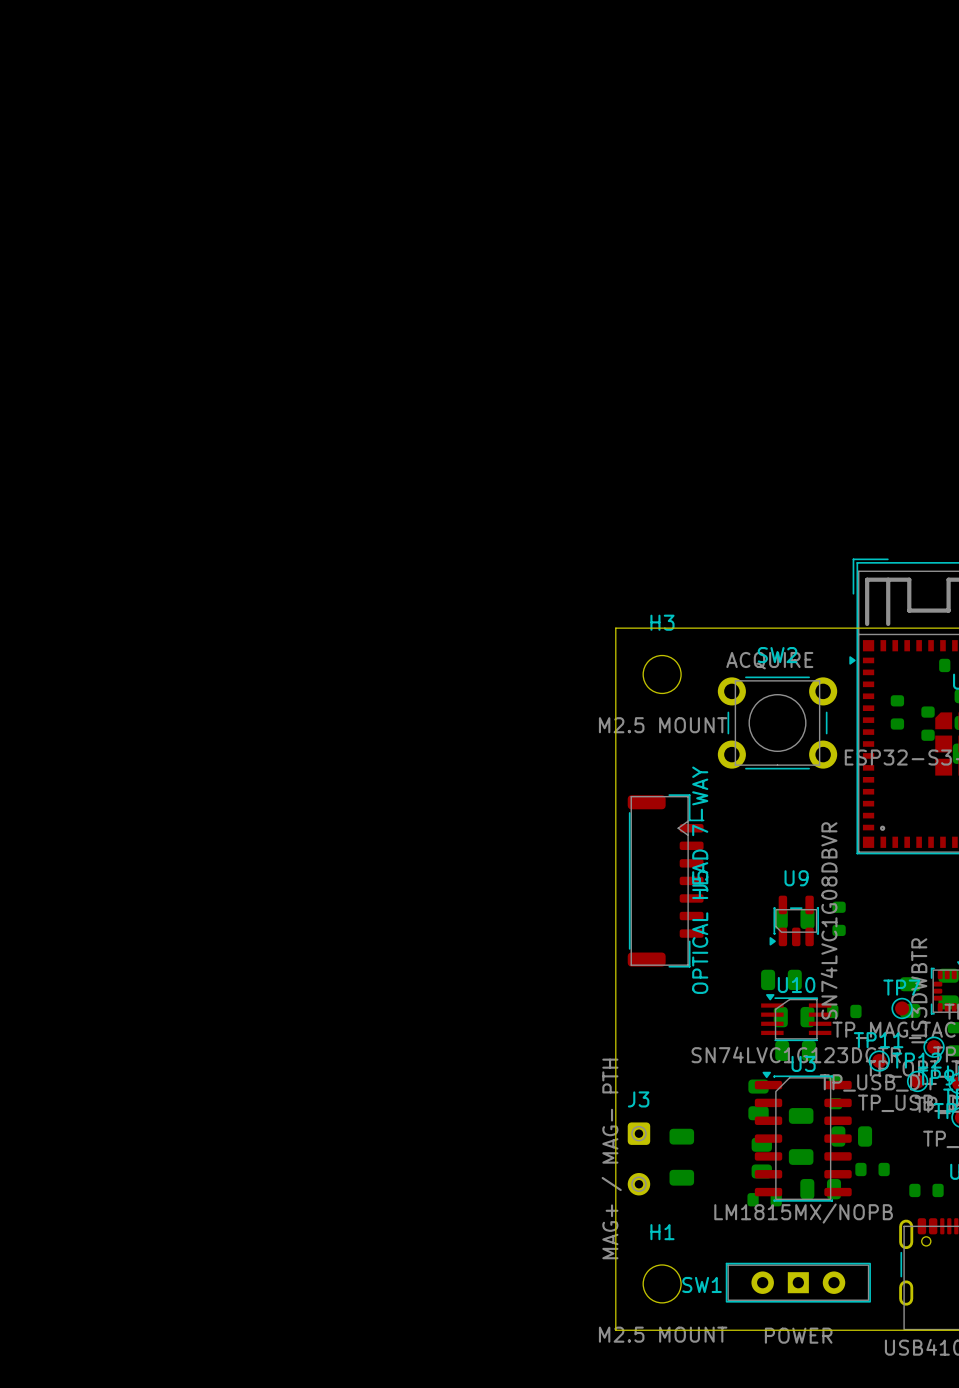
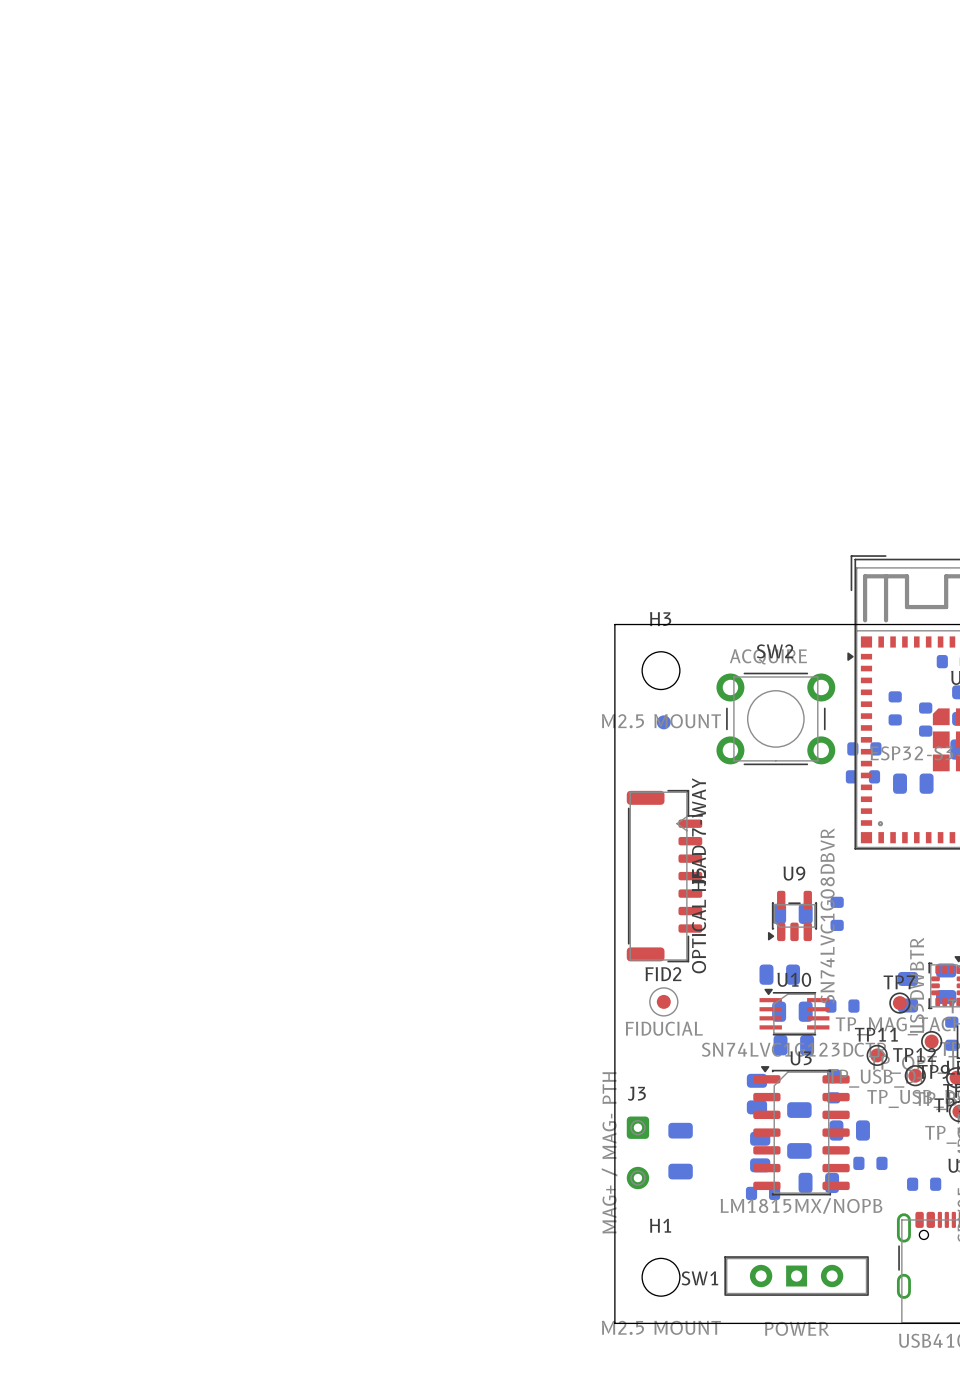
part: none -> (663, 722)
part: none -> (864, 748)
part: none -> (862, 776)
part: none -> (913, 783)
FID2: none -> FIDUCIAL (663, 1001)

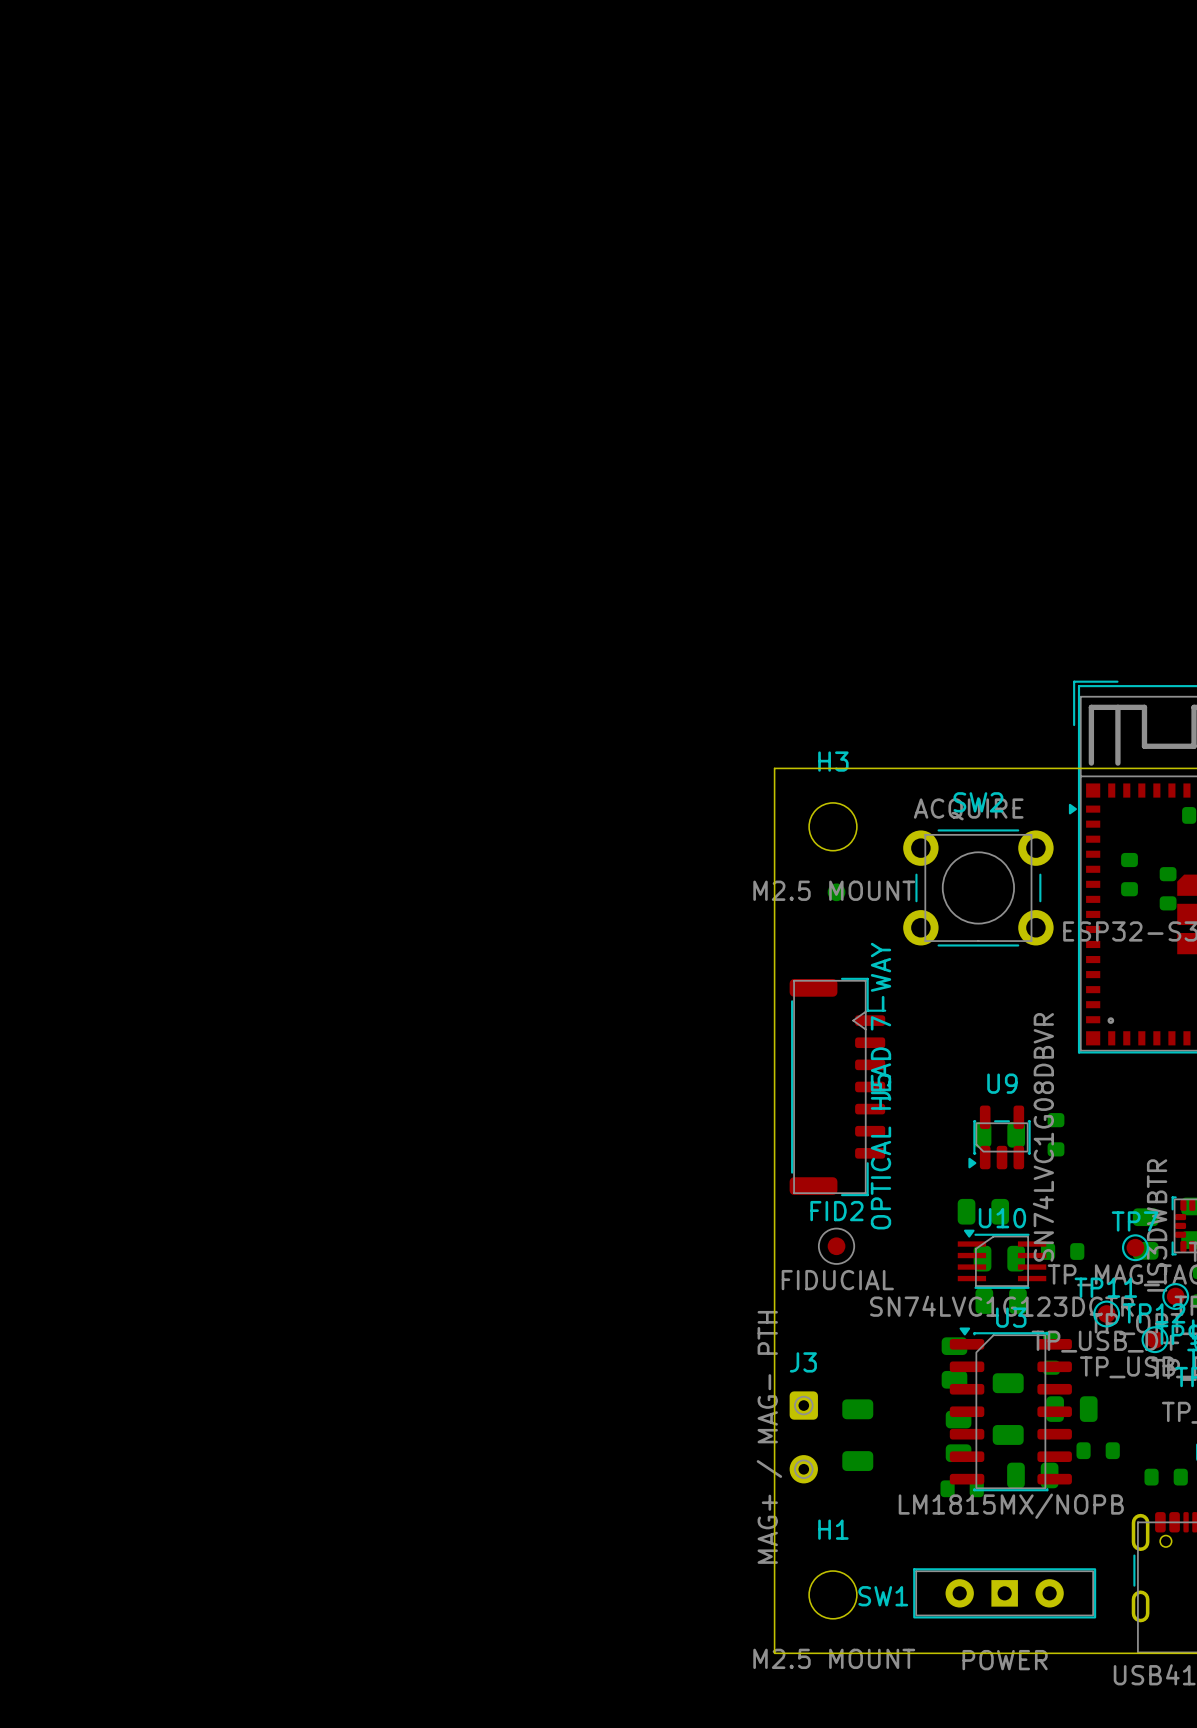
part: (864, 748) -> none
part: (862, 776) -> none
part: (913, 783) -> none

